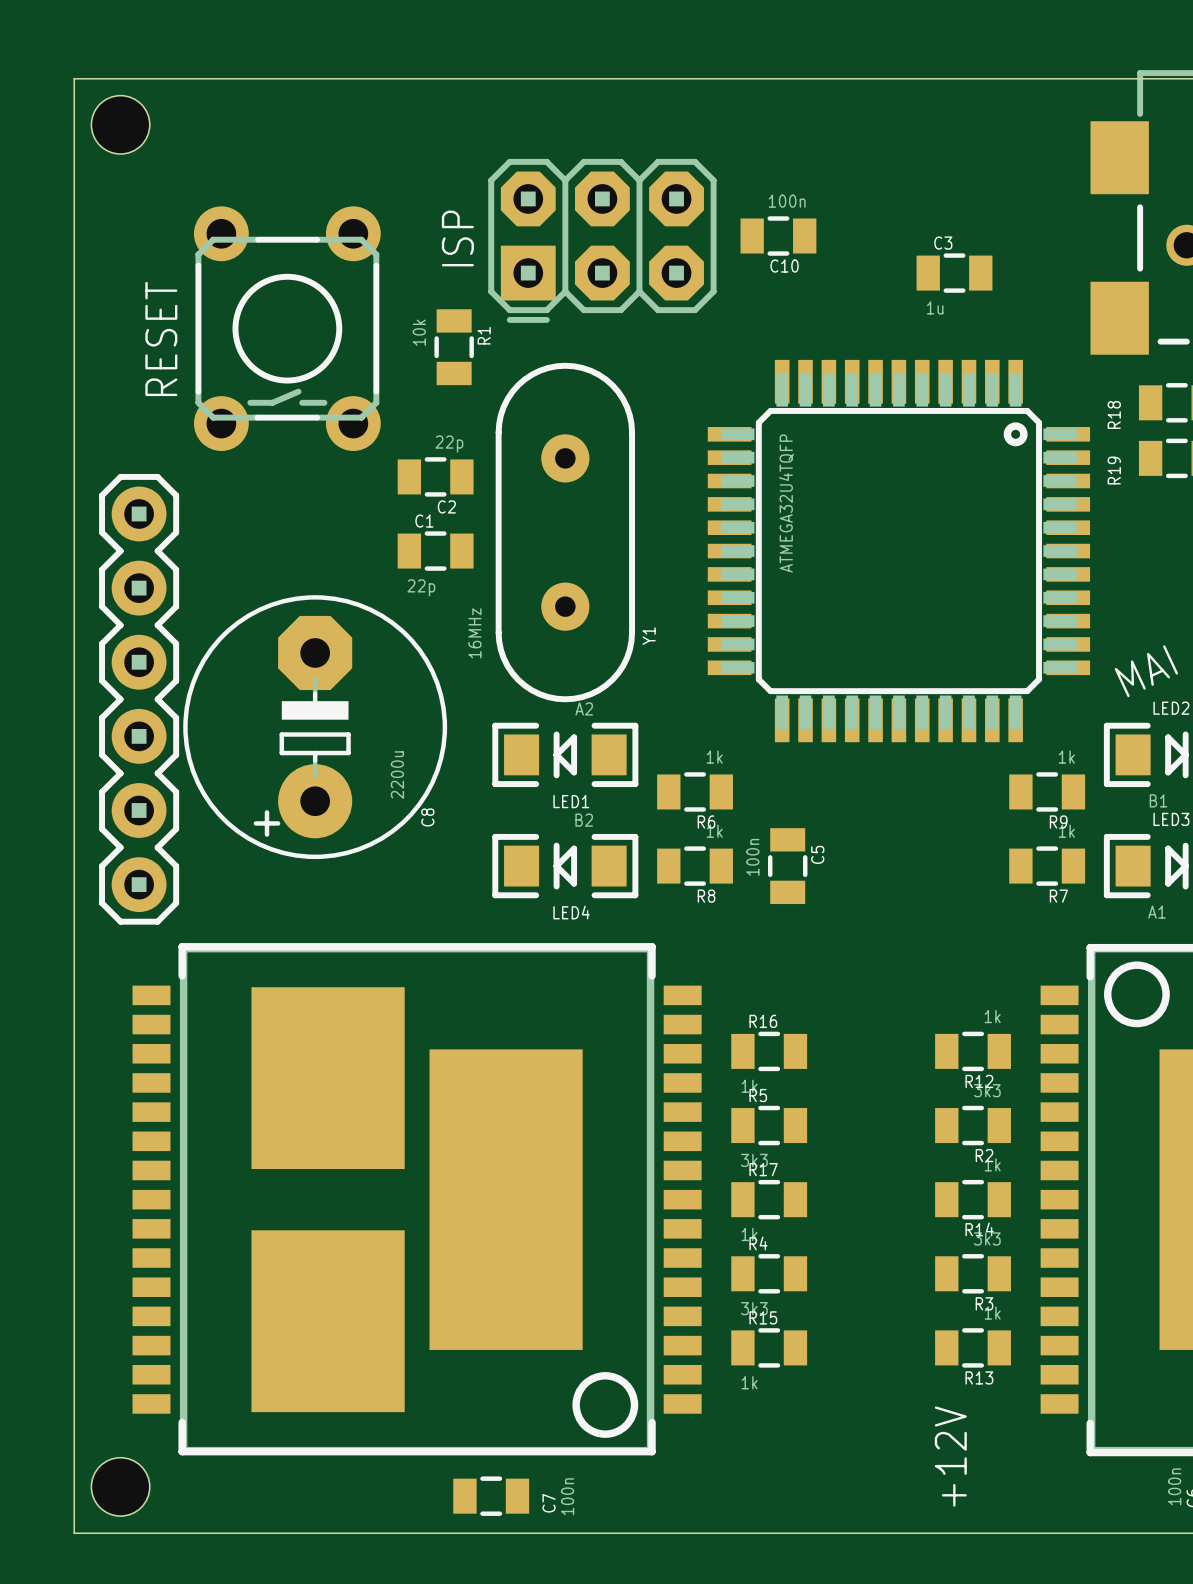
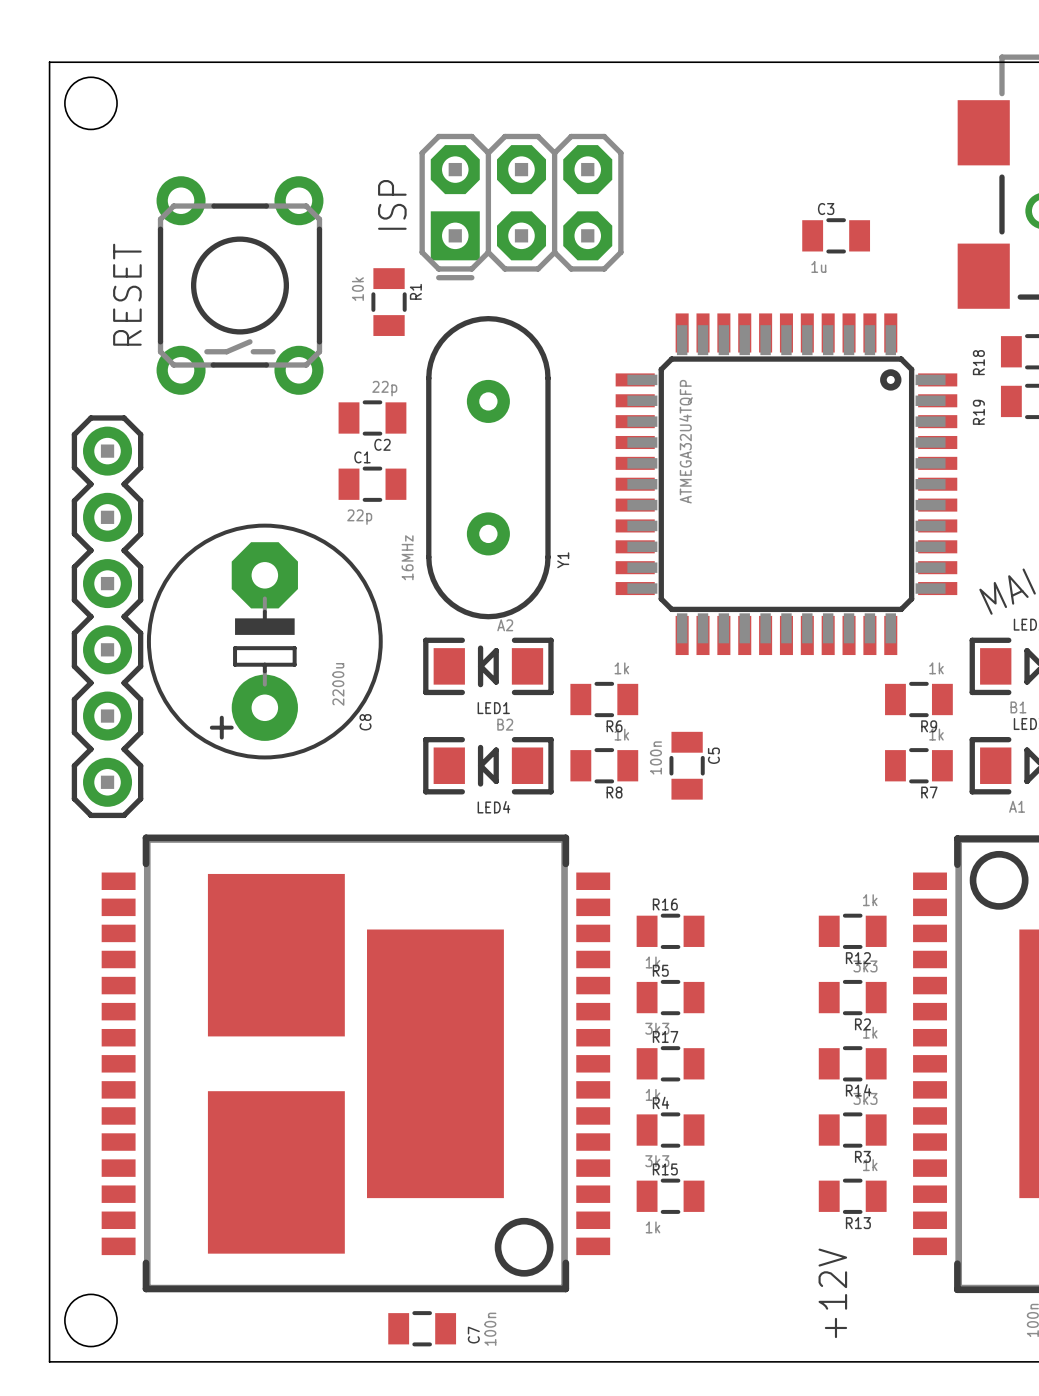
C10: 100n (778, 236) -> none

